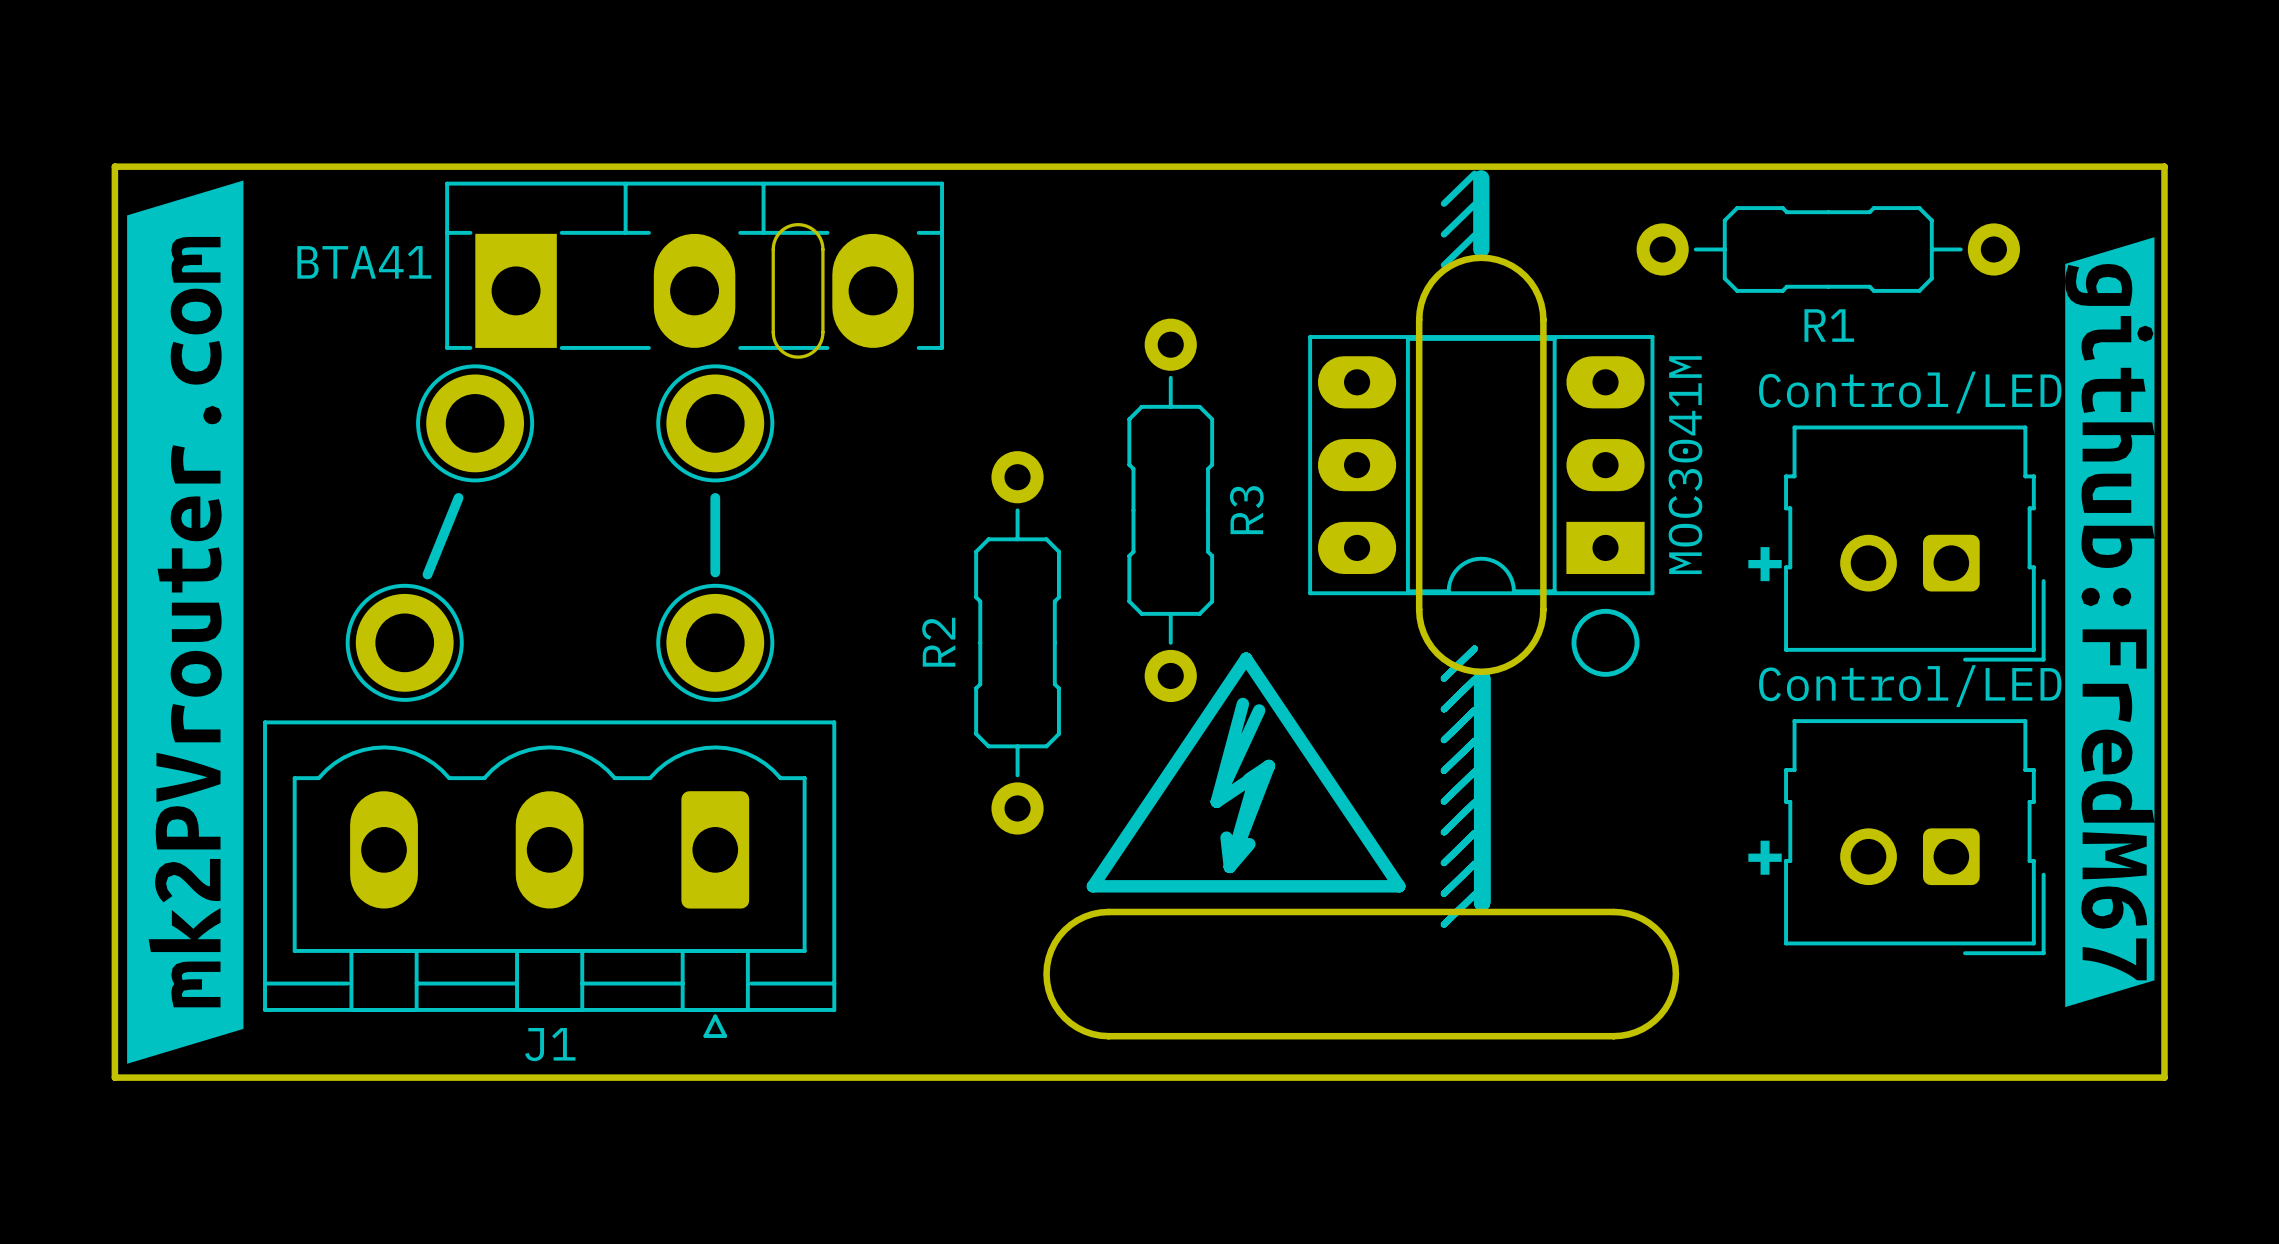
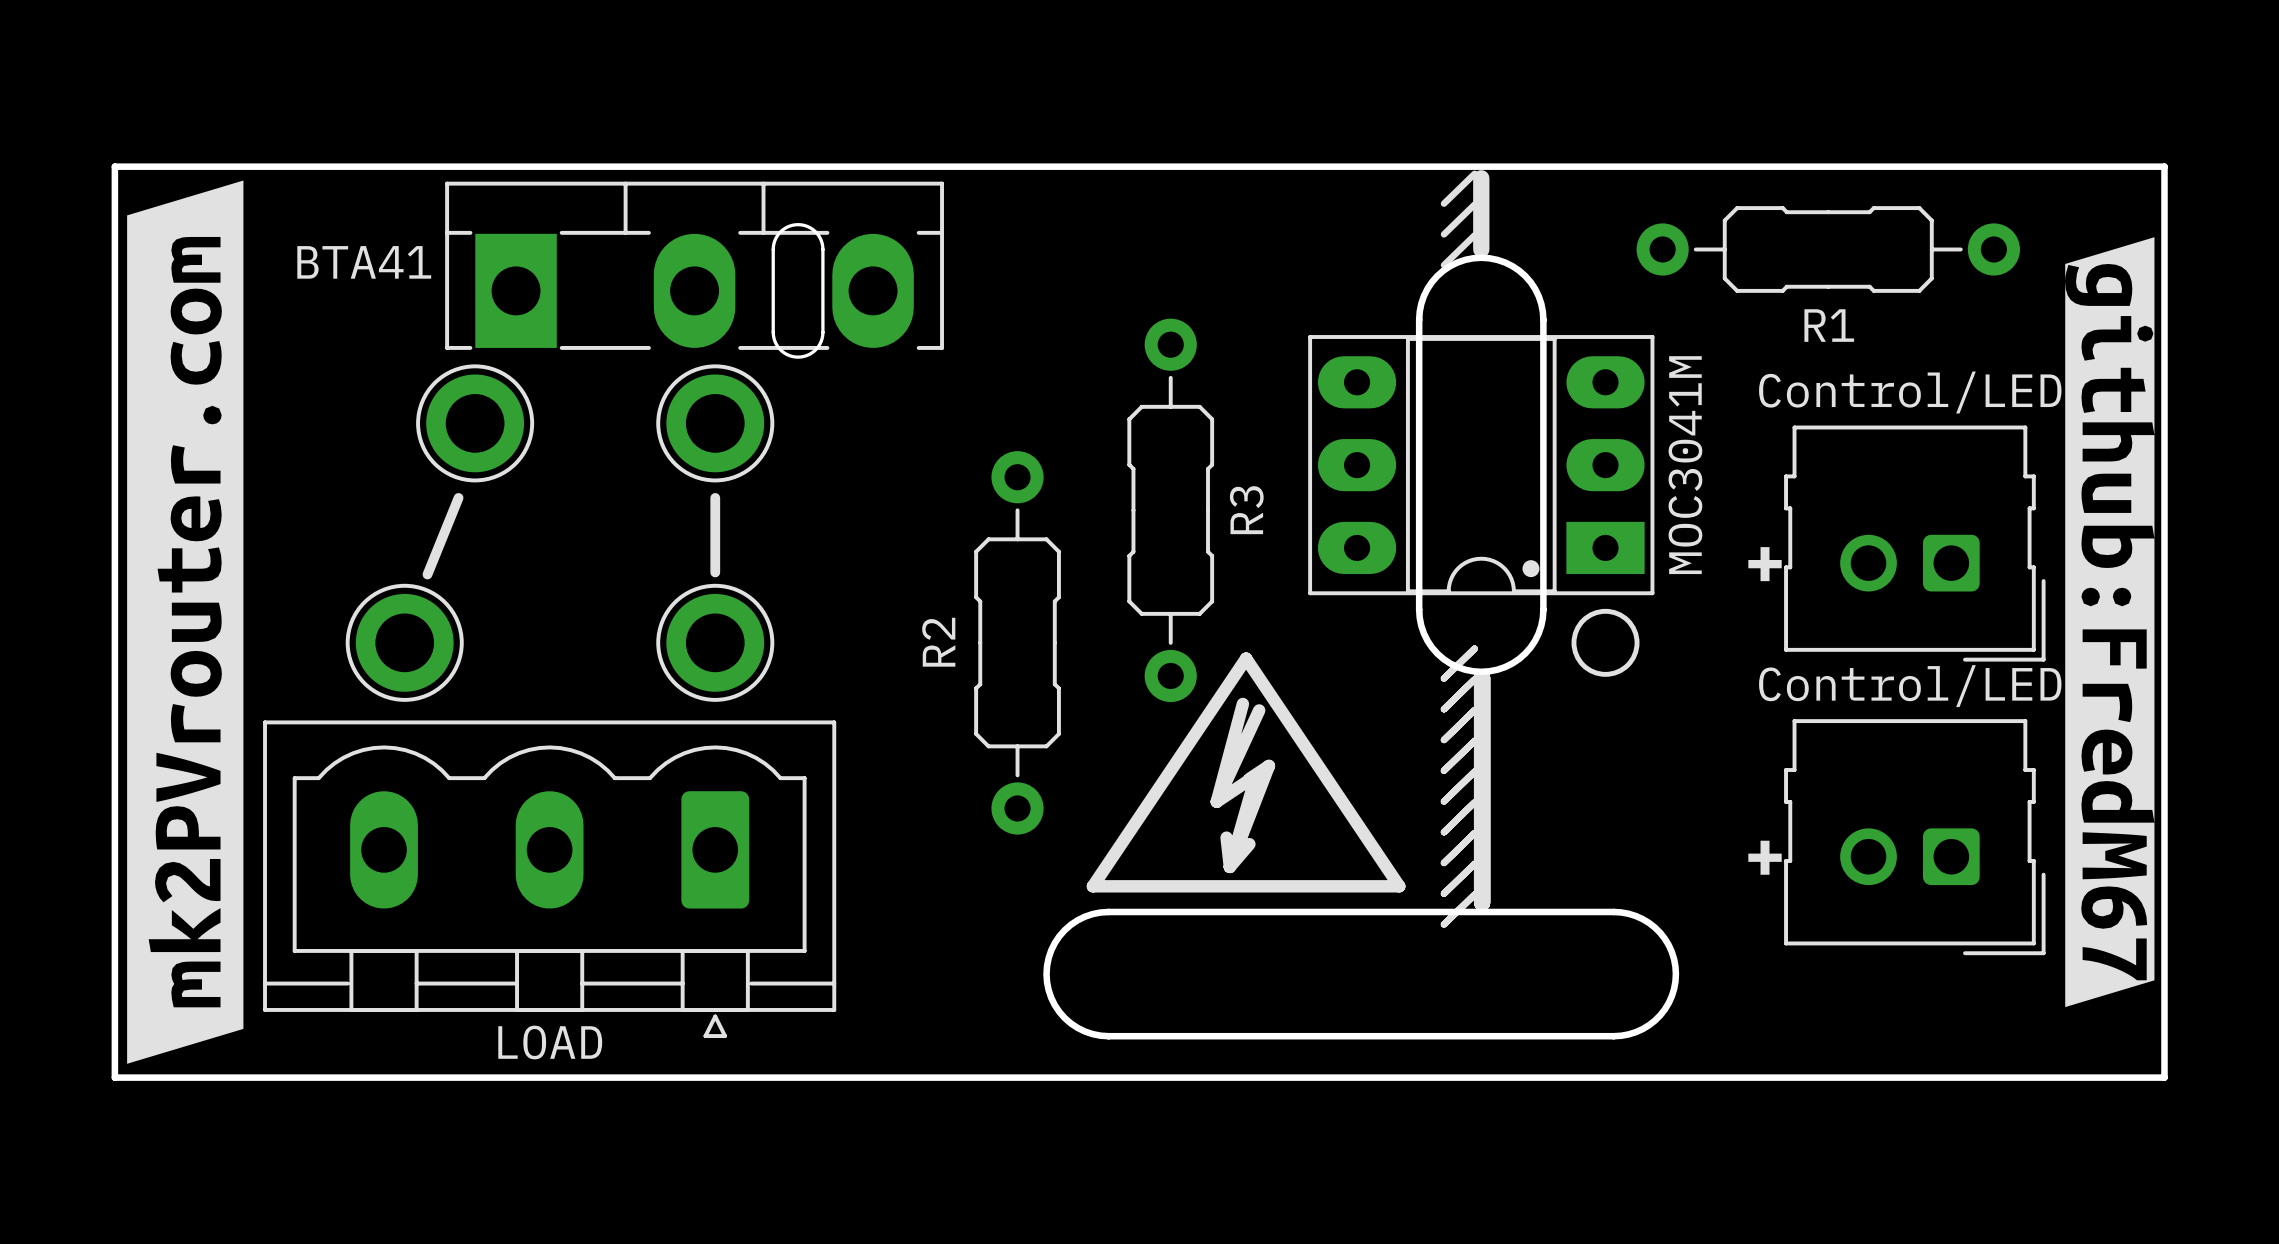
part footprint: [1308, 335, 1655, 596] -> [1308, 335, 1655, 596]
J1 text: none -> LOAD (550, 1042)
J1 name: J1 (550, 1044) -> none

